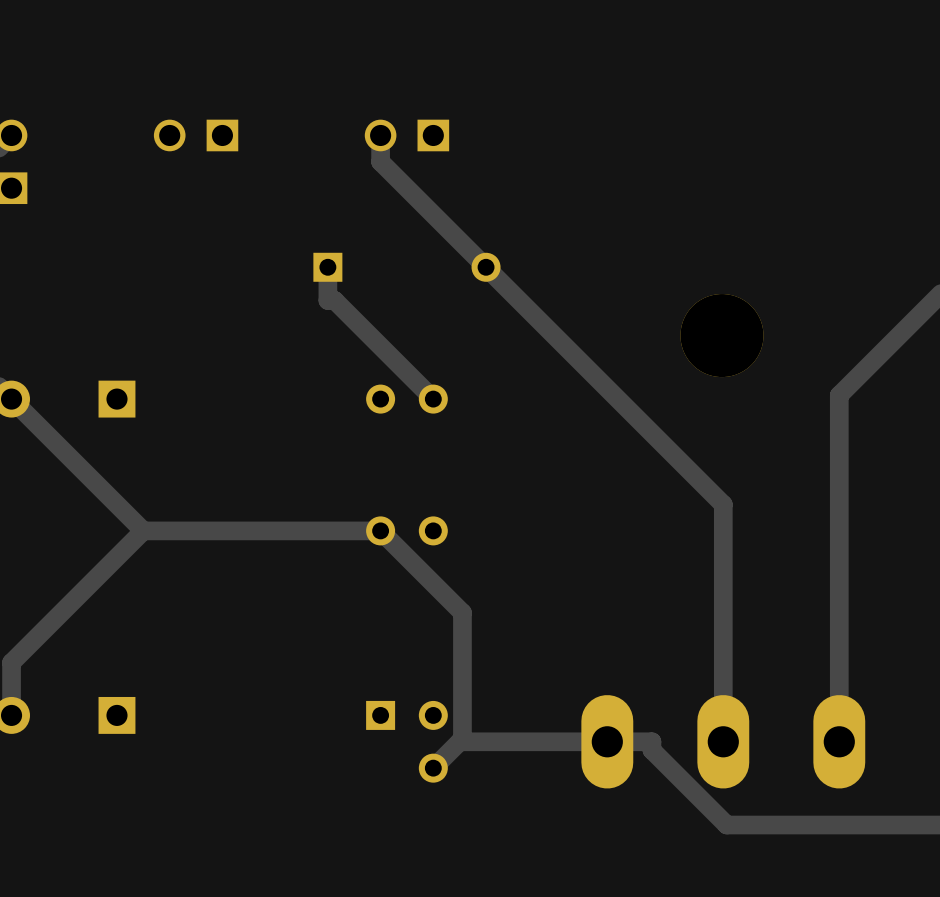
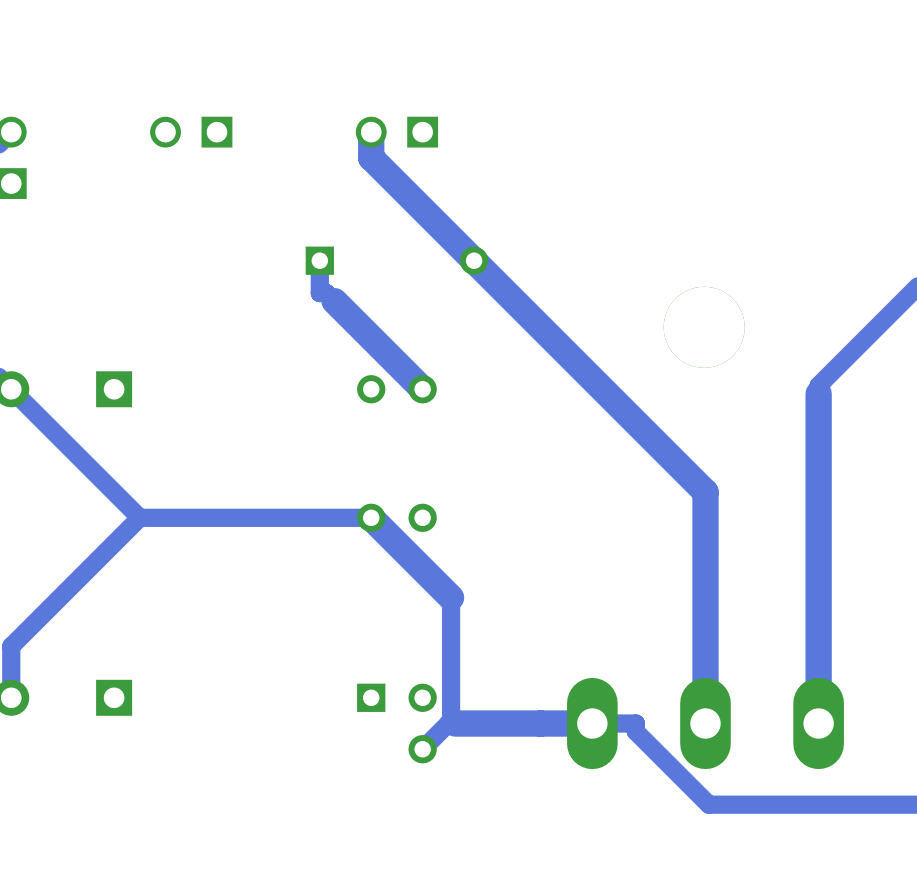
track width: thin (380, 135) (380, 161) (723, 504) (723, 741) -> thick (371, 132) (371, 157) (705, 492) (705, 723)
track width: thin (343, 308) (433, 399) -> thick (334, 301) (422, 389)
track width: thin (839, 403) (839, 741) -> thick (818, 393) (818, 723)
track width: thin (380, 530) (462, 612) -> thick (371, 517) (451, 597)
track width: thin (607, 741) (466, 741) -> thick (592, 723) (455, 723)

